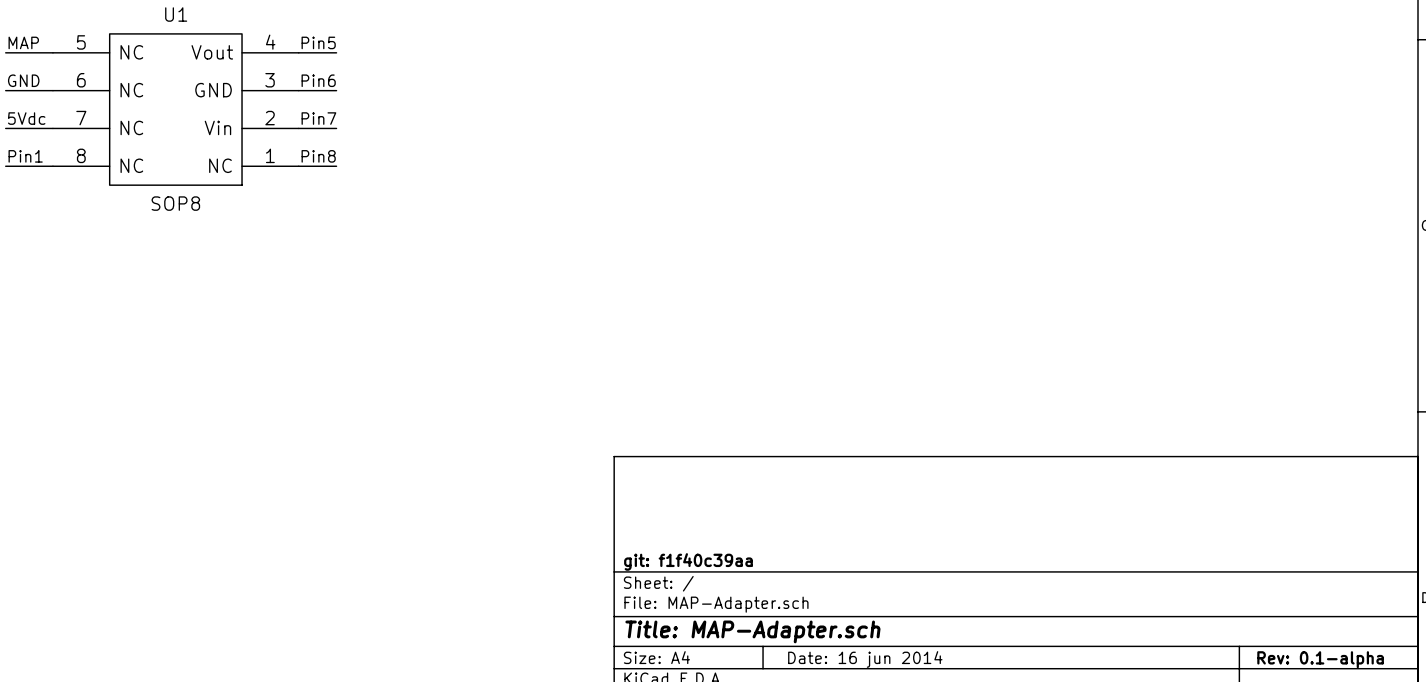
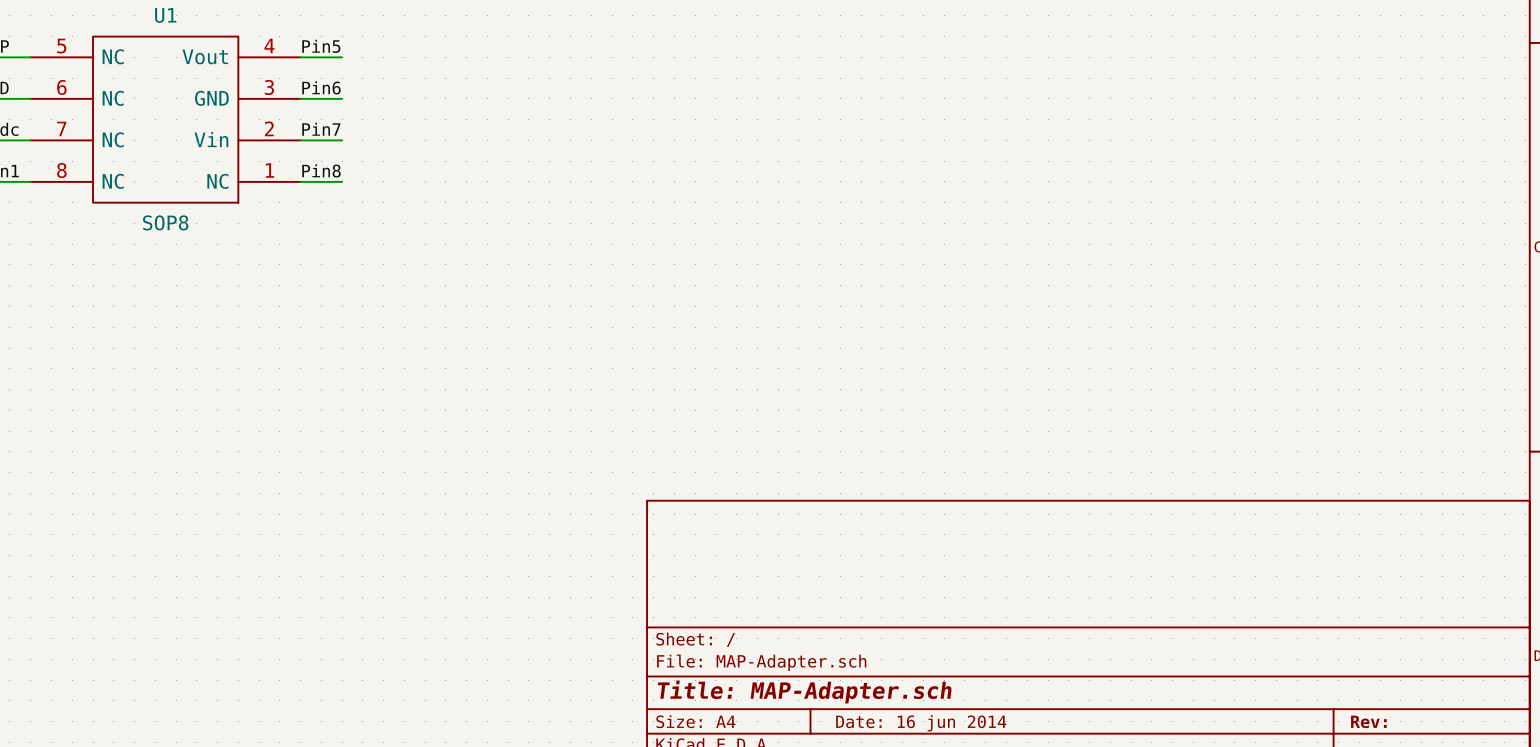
title block: git: f1f40c39aa (688, 561) -> none
title block: Rev: 0.1-alpha (1320, 659) -> Rev: (1368, 721)

